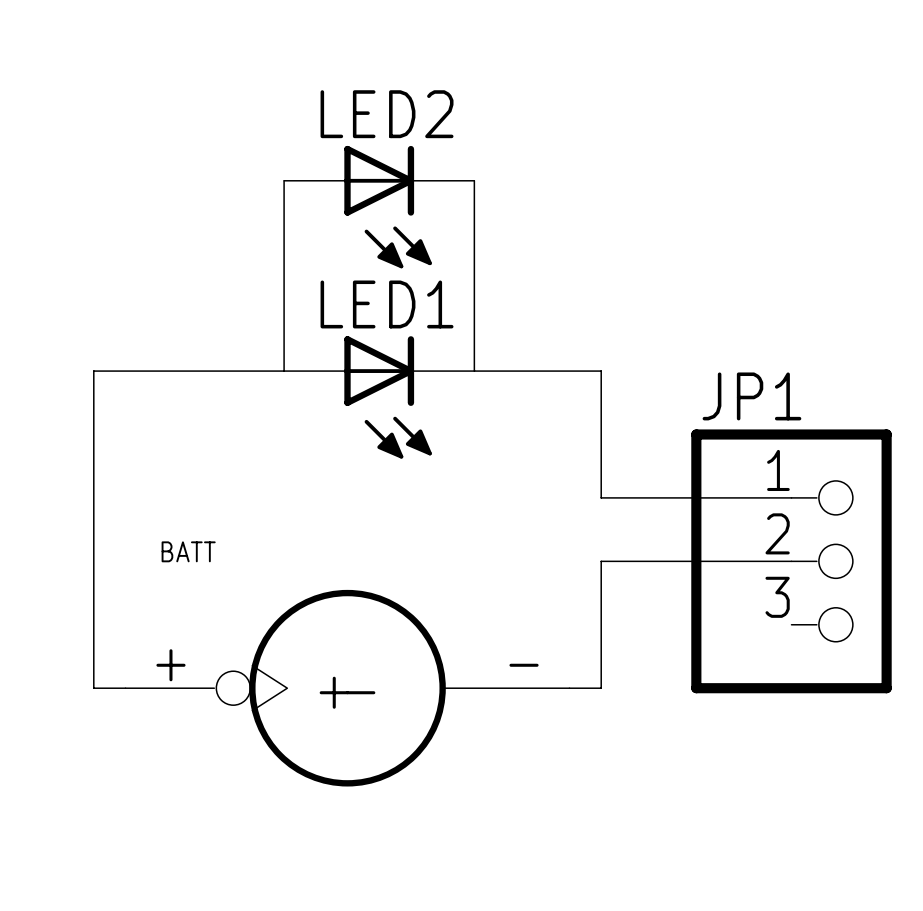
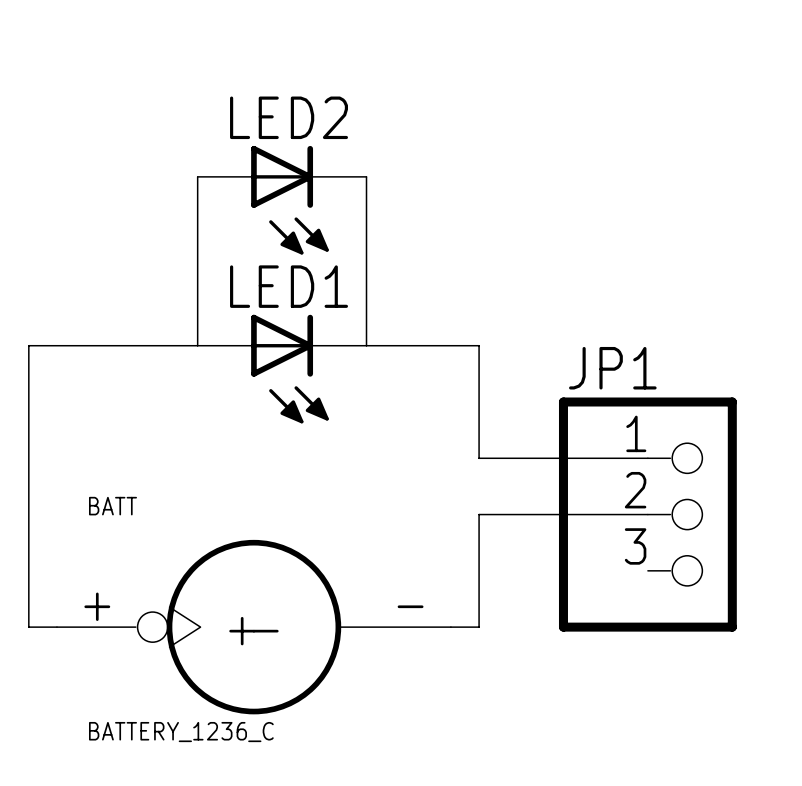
BATT value: none -> BATTERY_1236_C (181, 732)

